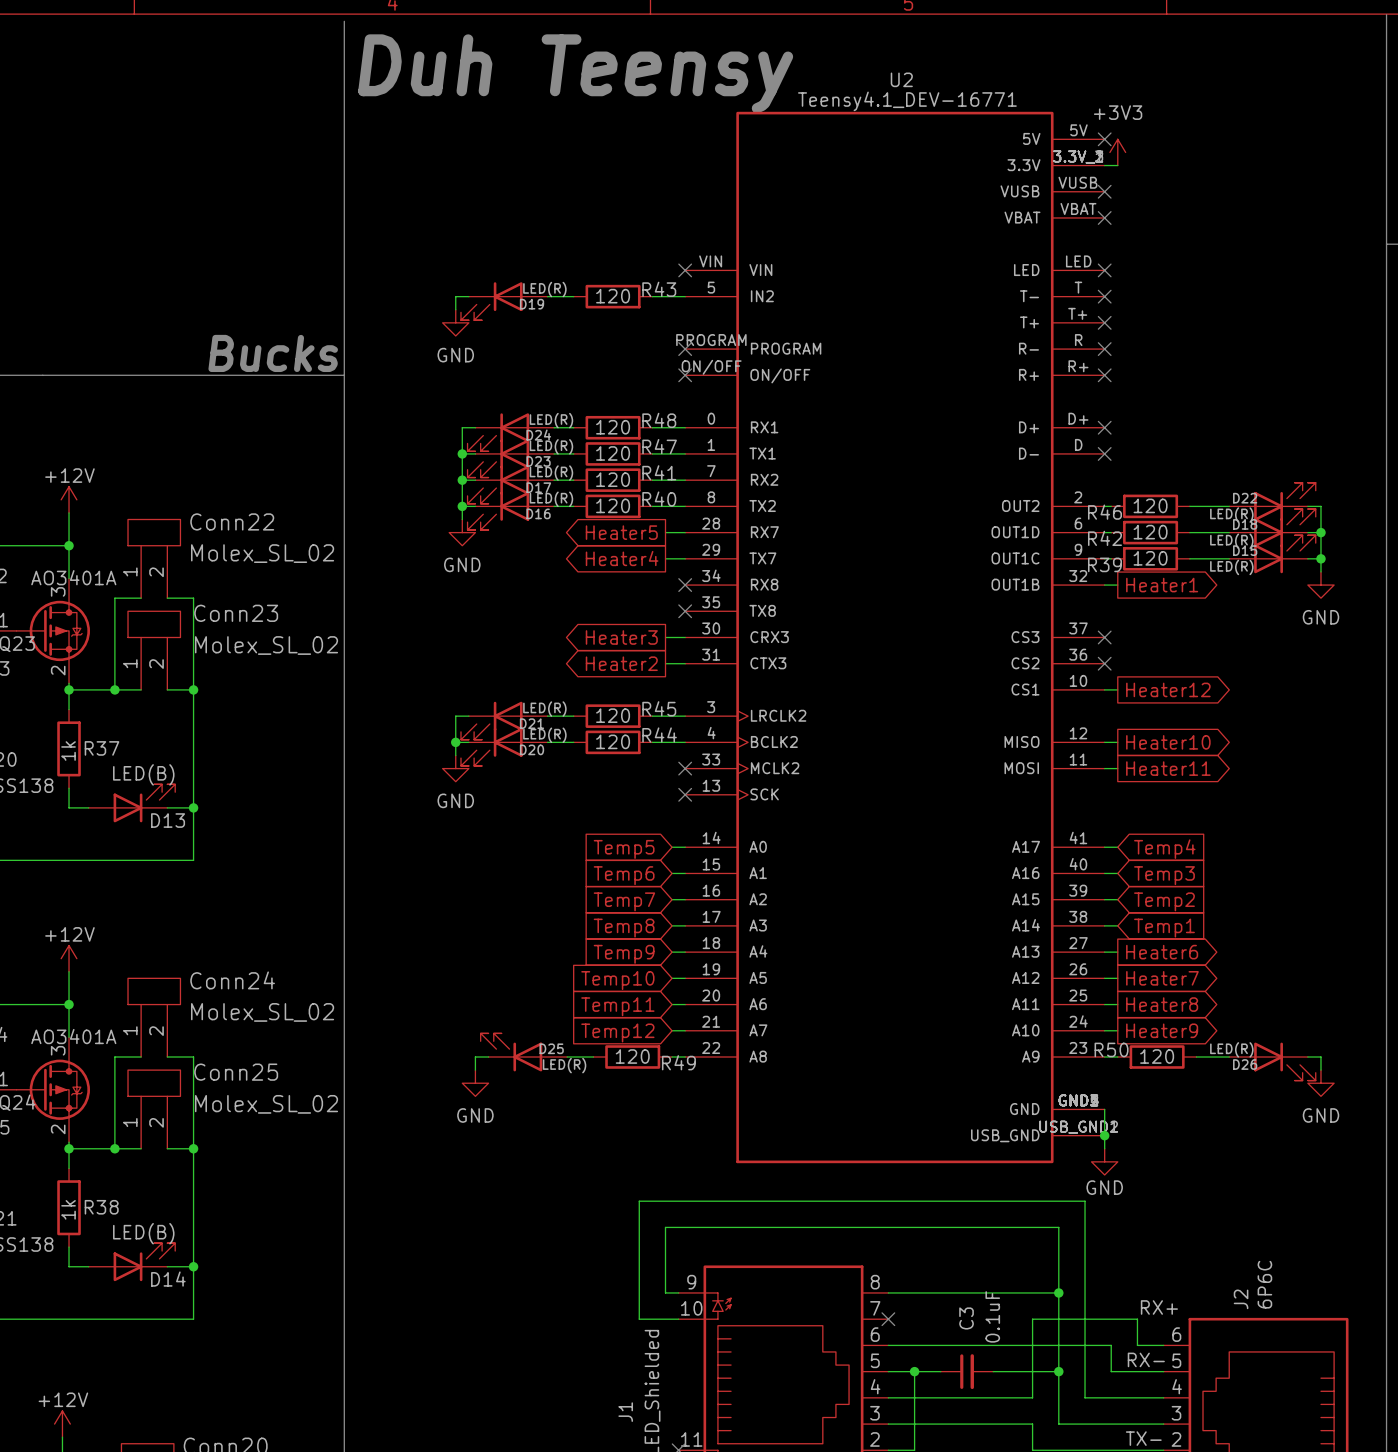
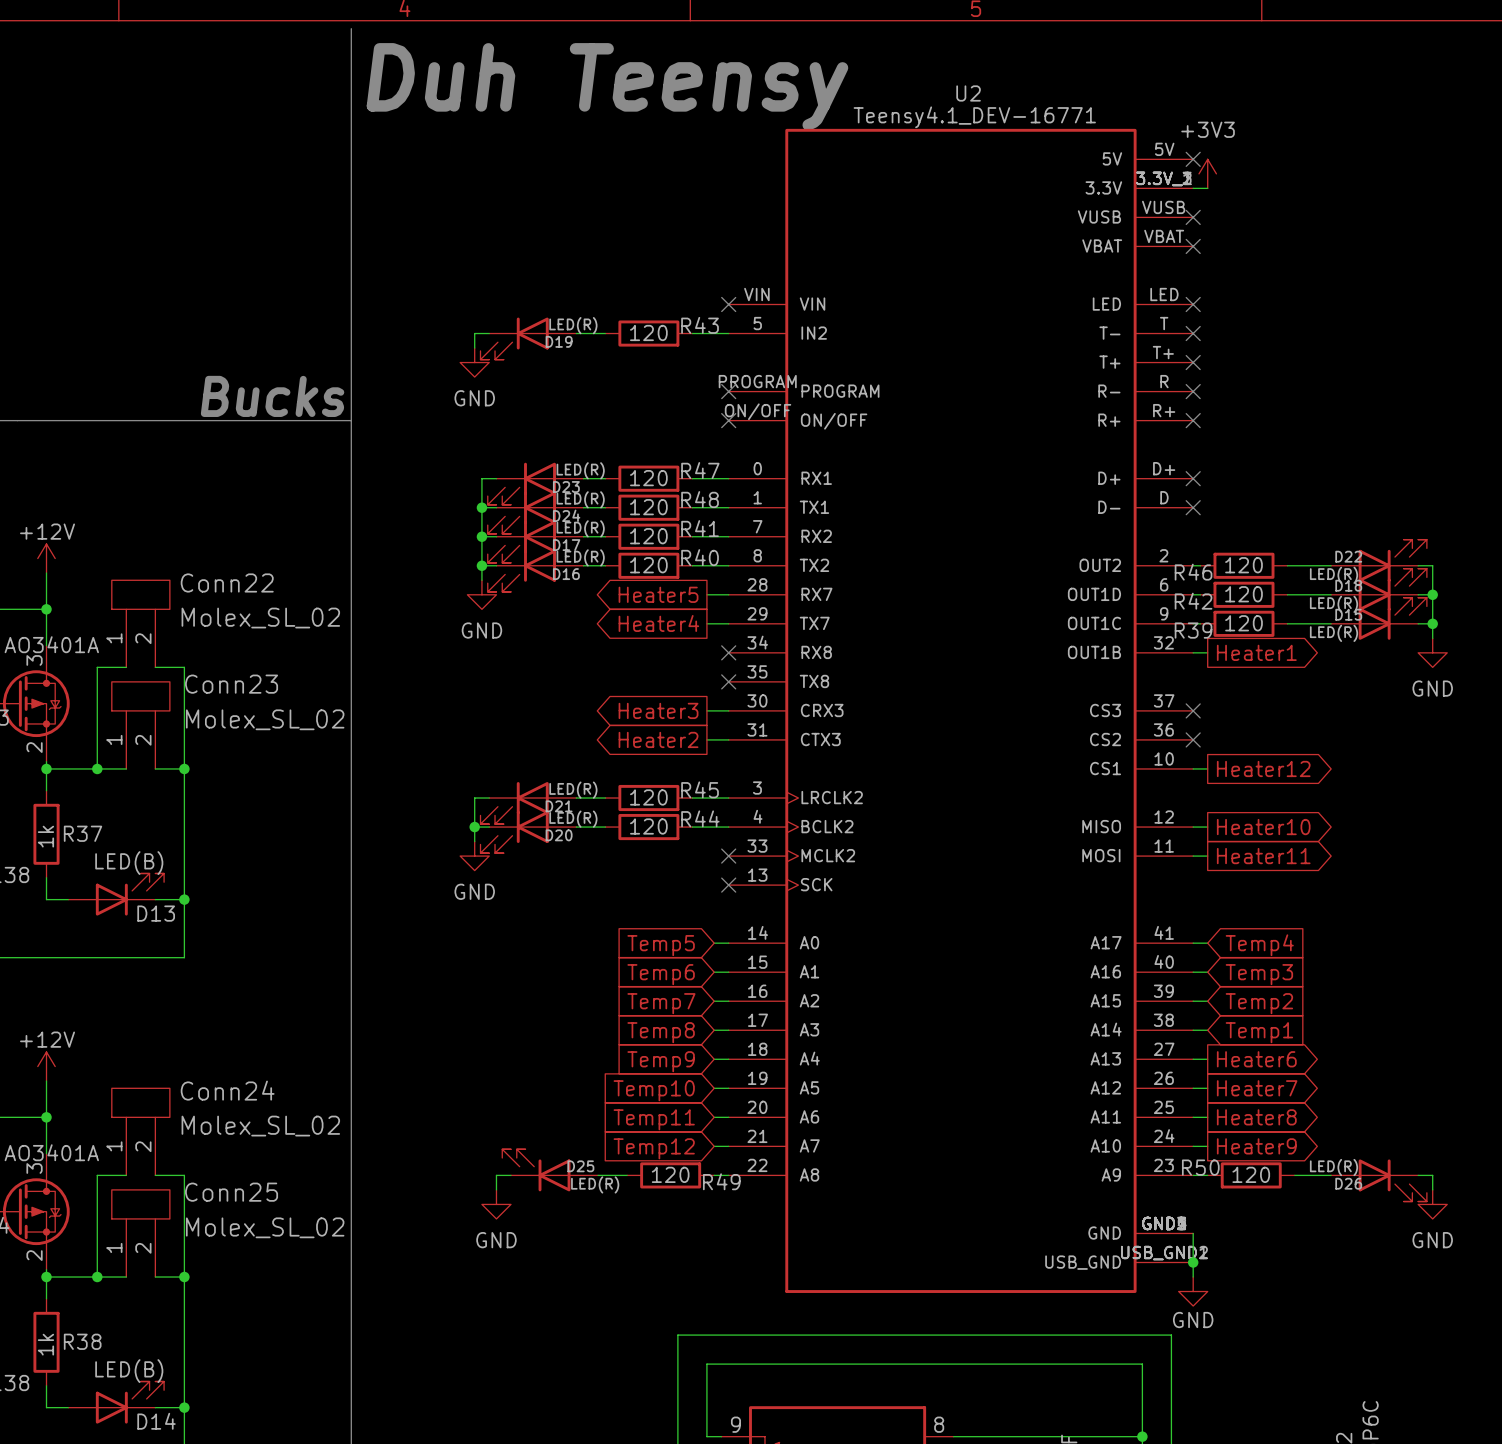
R48 name: R48 (659, 420) -> R47 (700, 470)
D24 name: D24 (538, 435) -> D23 (566, 487)
R47 name: R47 (659, 446) -> R48 (700, 499)
D23 name: D23 (538, 461) -> D24 (566, 515)

